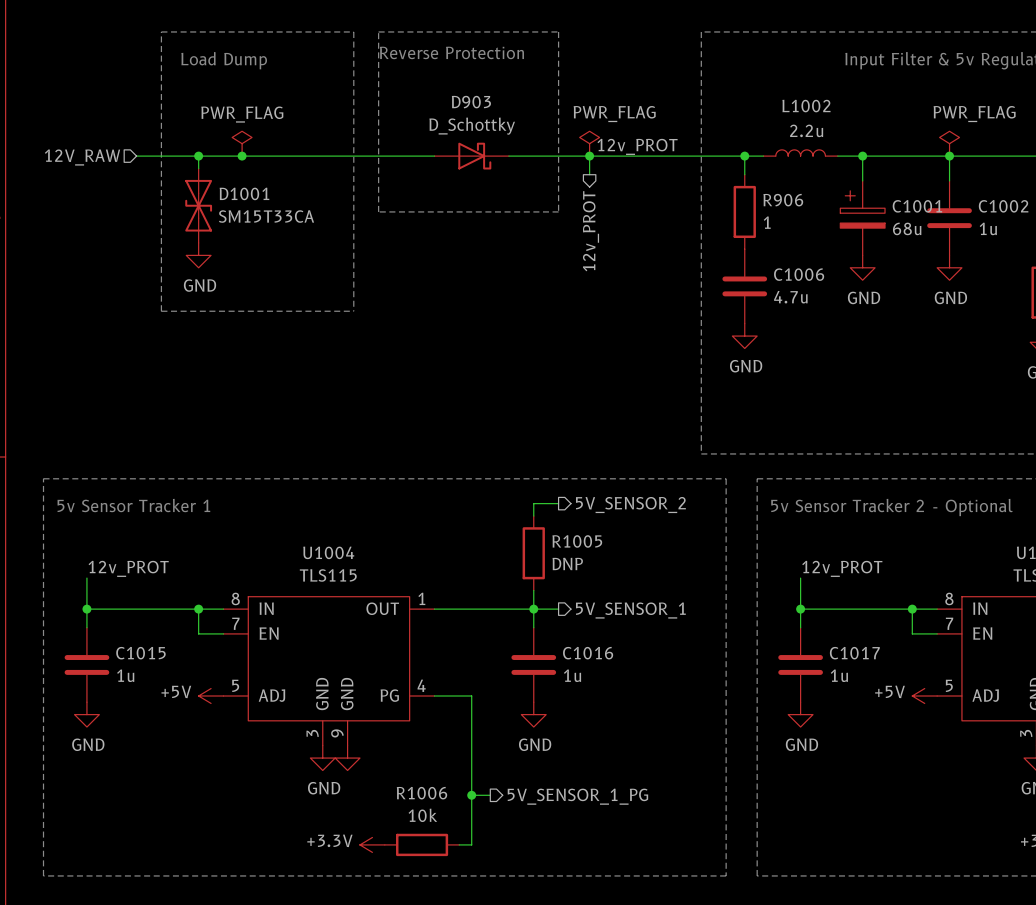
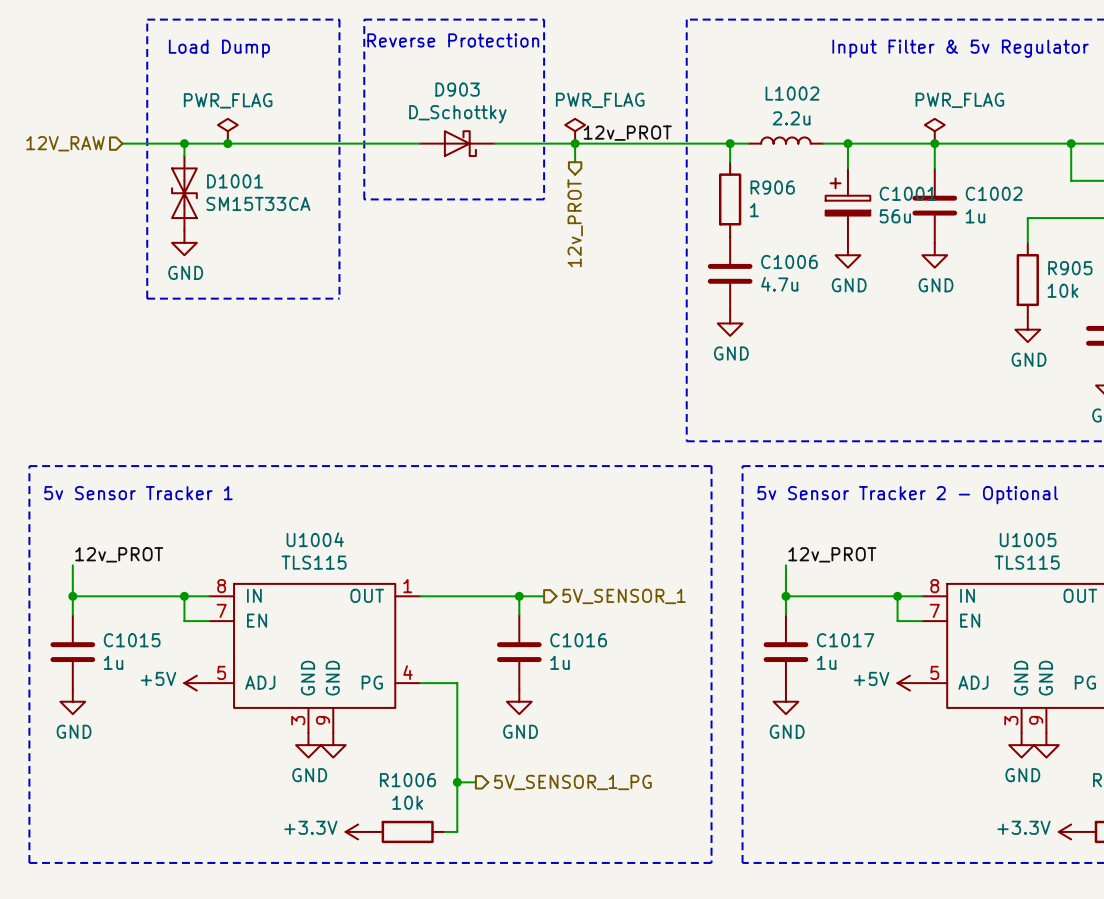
C1001 value: 68u (907, 228) -> 56u (895, 216)
wire: (558, 503) (533, 503) (533, 516) -> none
hierarchical label: 5V_SENSOR_2 (630, 505) -> none
R1005: DNP (533, 553) -> none
wire: (533, 590) (533, 609) -> none

